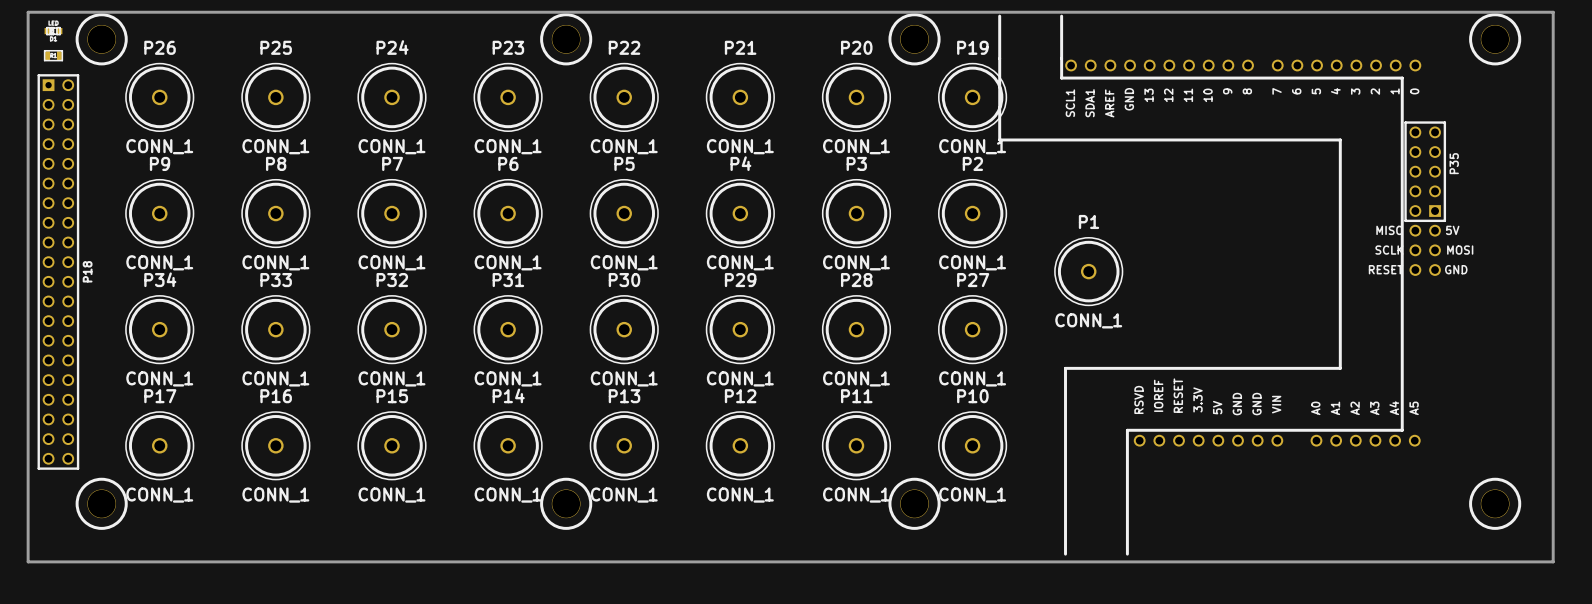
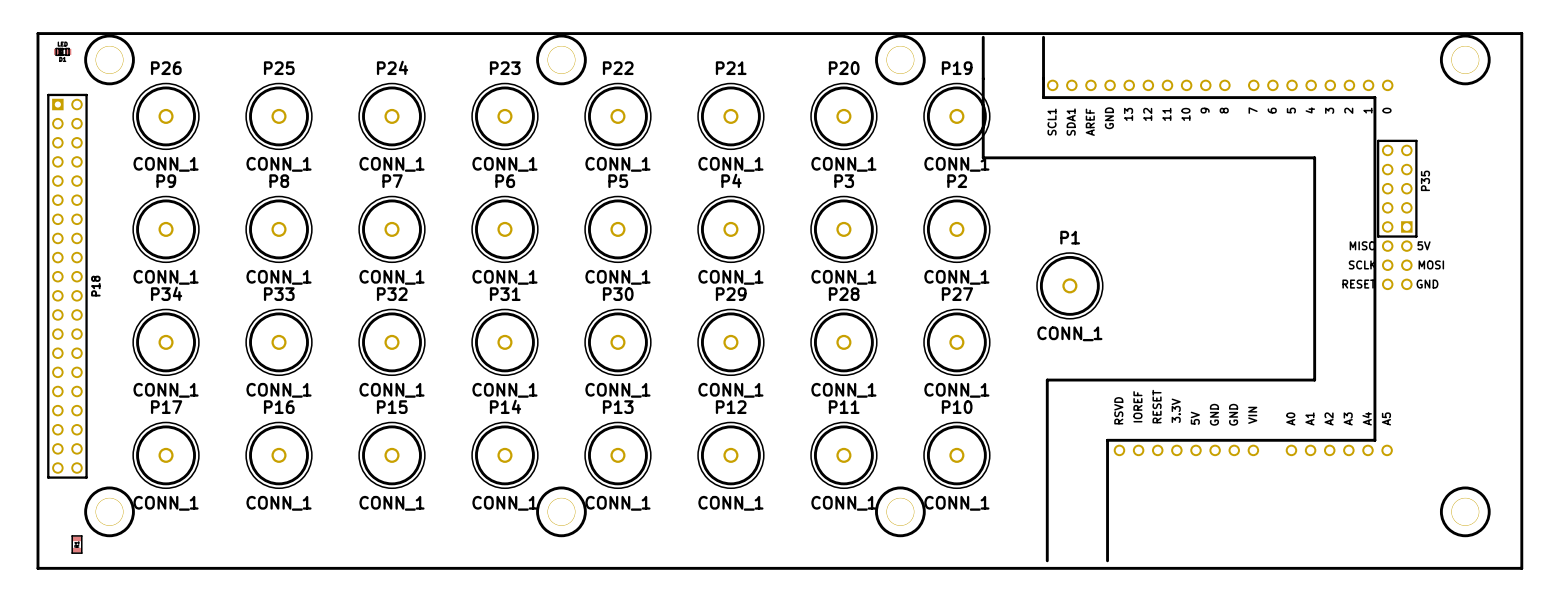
part rotation: 0° (53, 55) -> 90° clockwise (76, 544)
part position: (53, 55) -> (76, 544)

